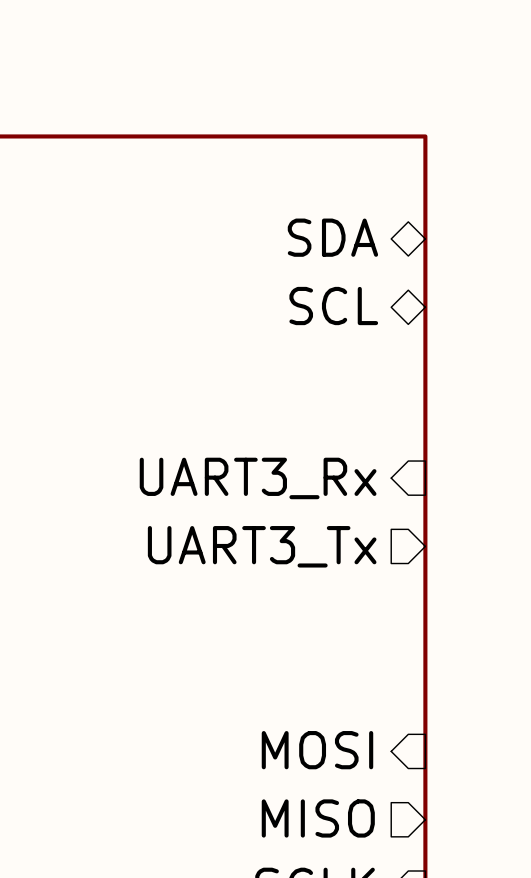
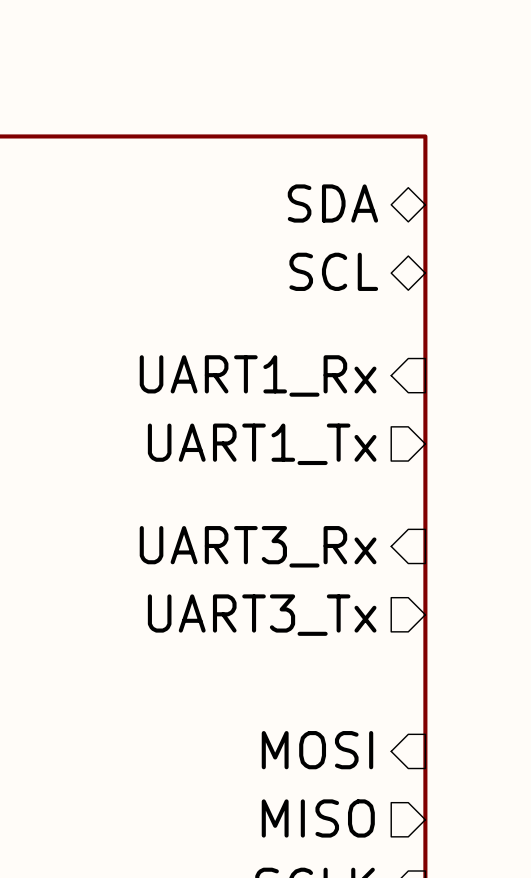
sheet pin position: SDA (332, 237) -> SDA (332, 203)
sheet pin position: SCL (333, 306) -> SCL (333, 271)
sheet pin: none -> UART1_Rx (258, 375)
sheet pin shape: input (258, 478) -> output (262, 444)
sheet pin: UART3_Rx (258, 478) -> UART1_Tx (262, 444)
sheet pin shape: output (262, 546) -> input (258, 546)
sheet pin: UART3_Tx (262, 546) -> UART3_Rx (258, 546)
sheet pin: none -> UART3_Tx (262, 615)

